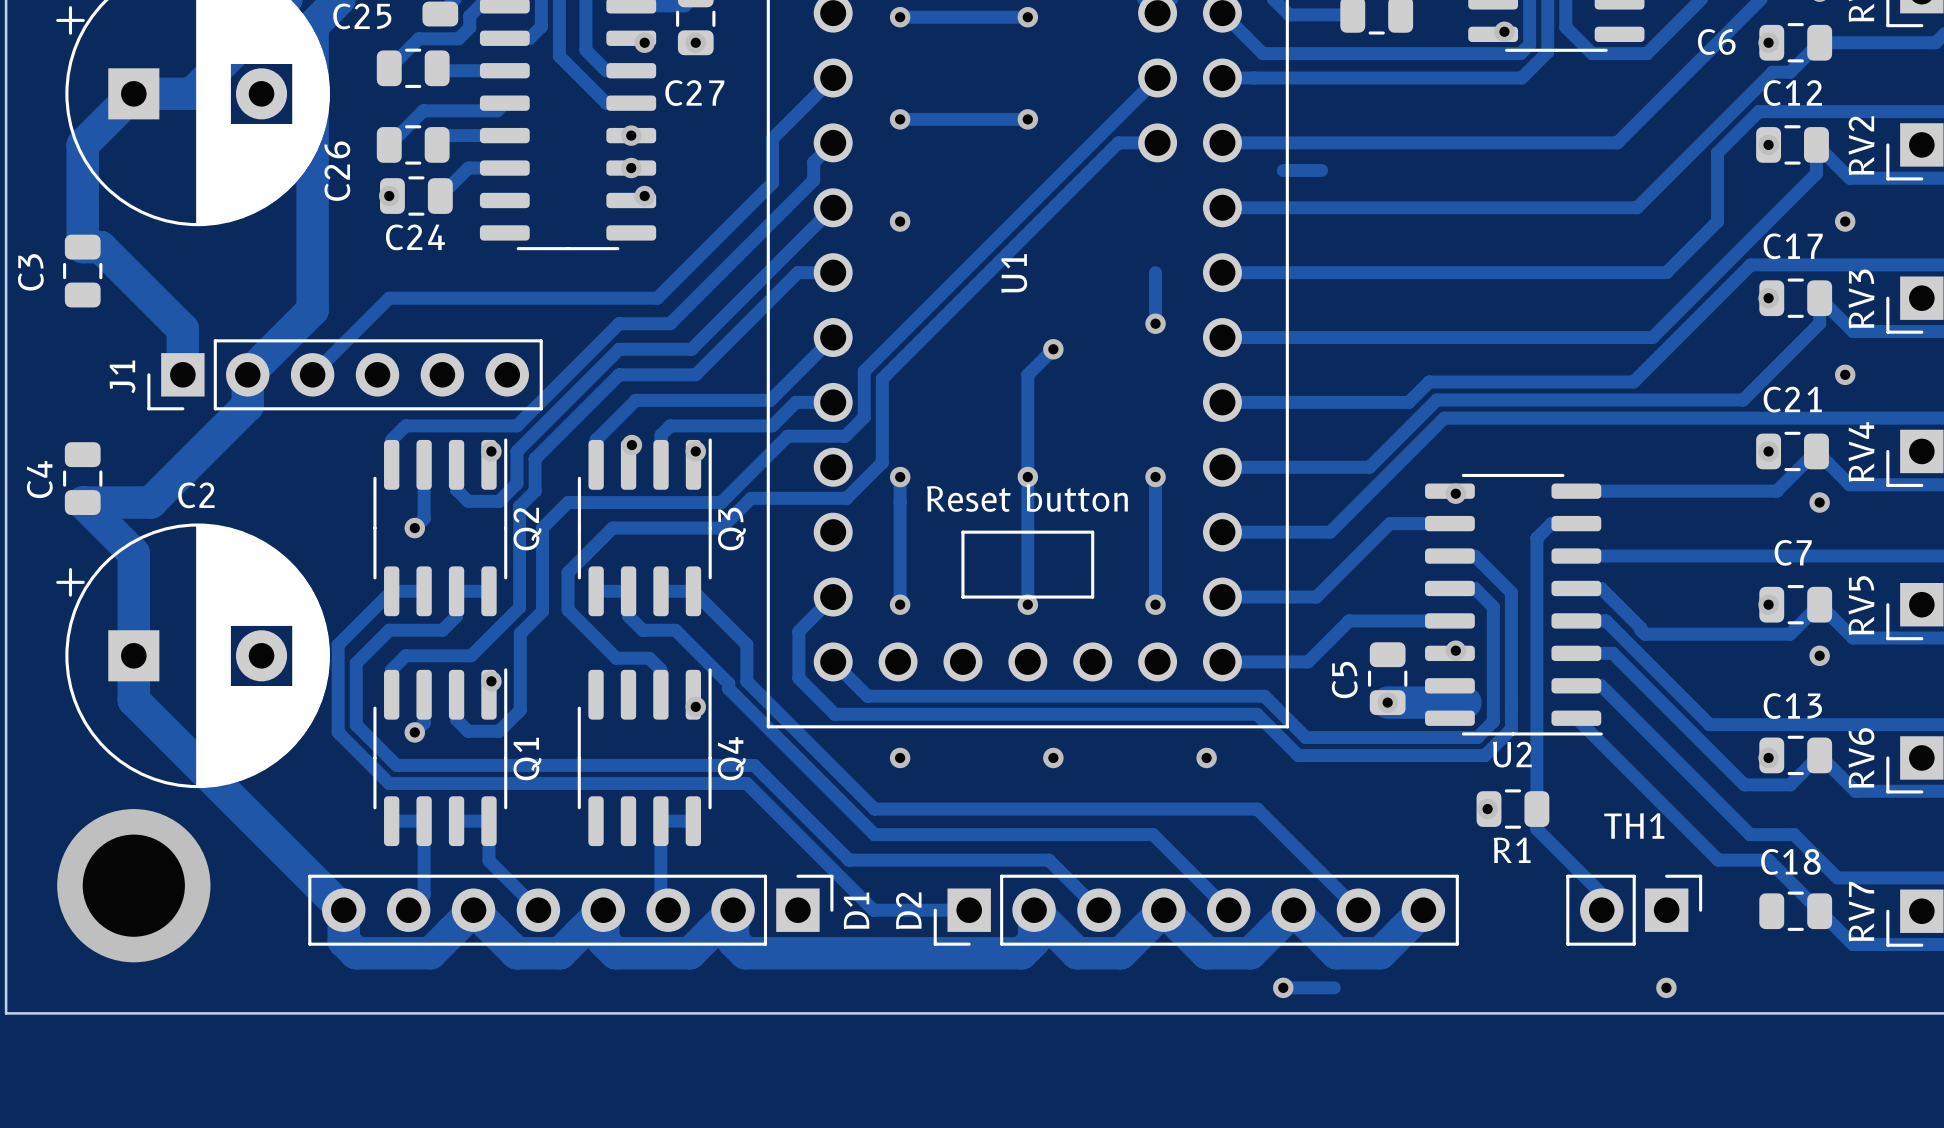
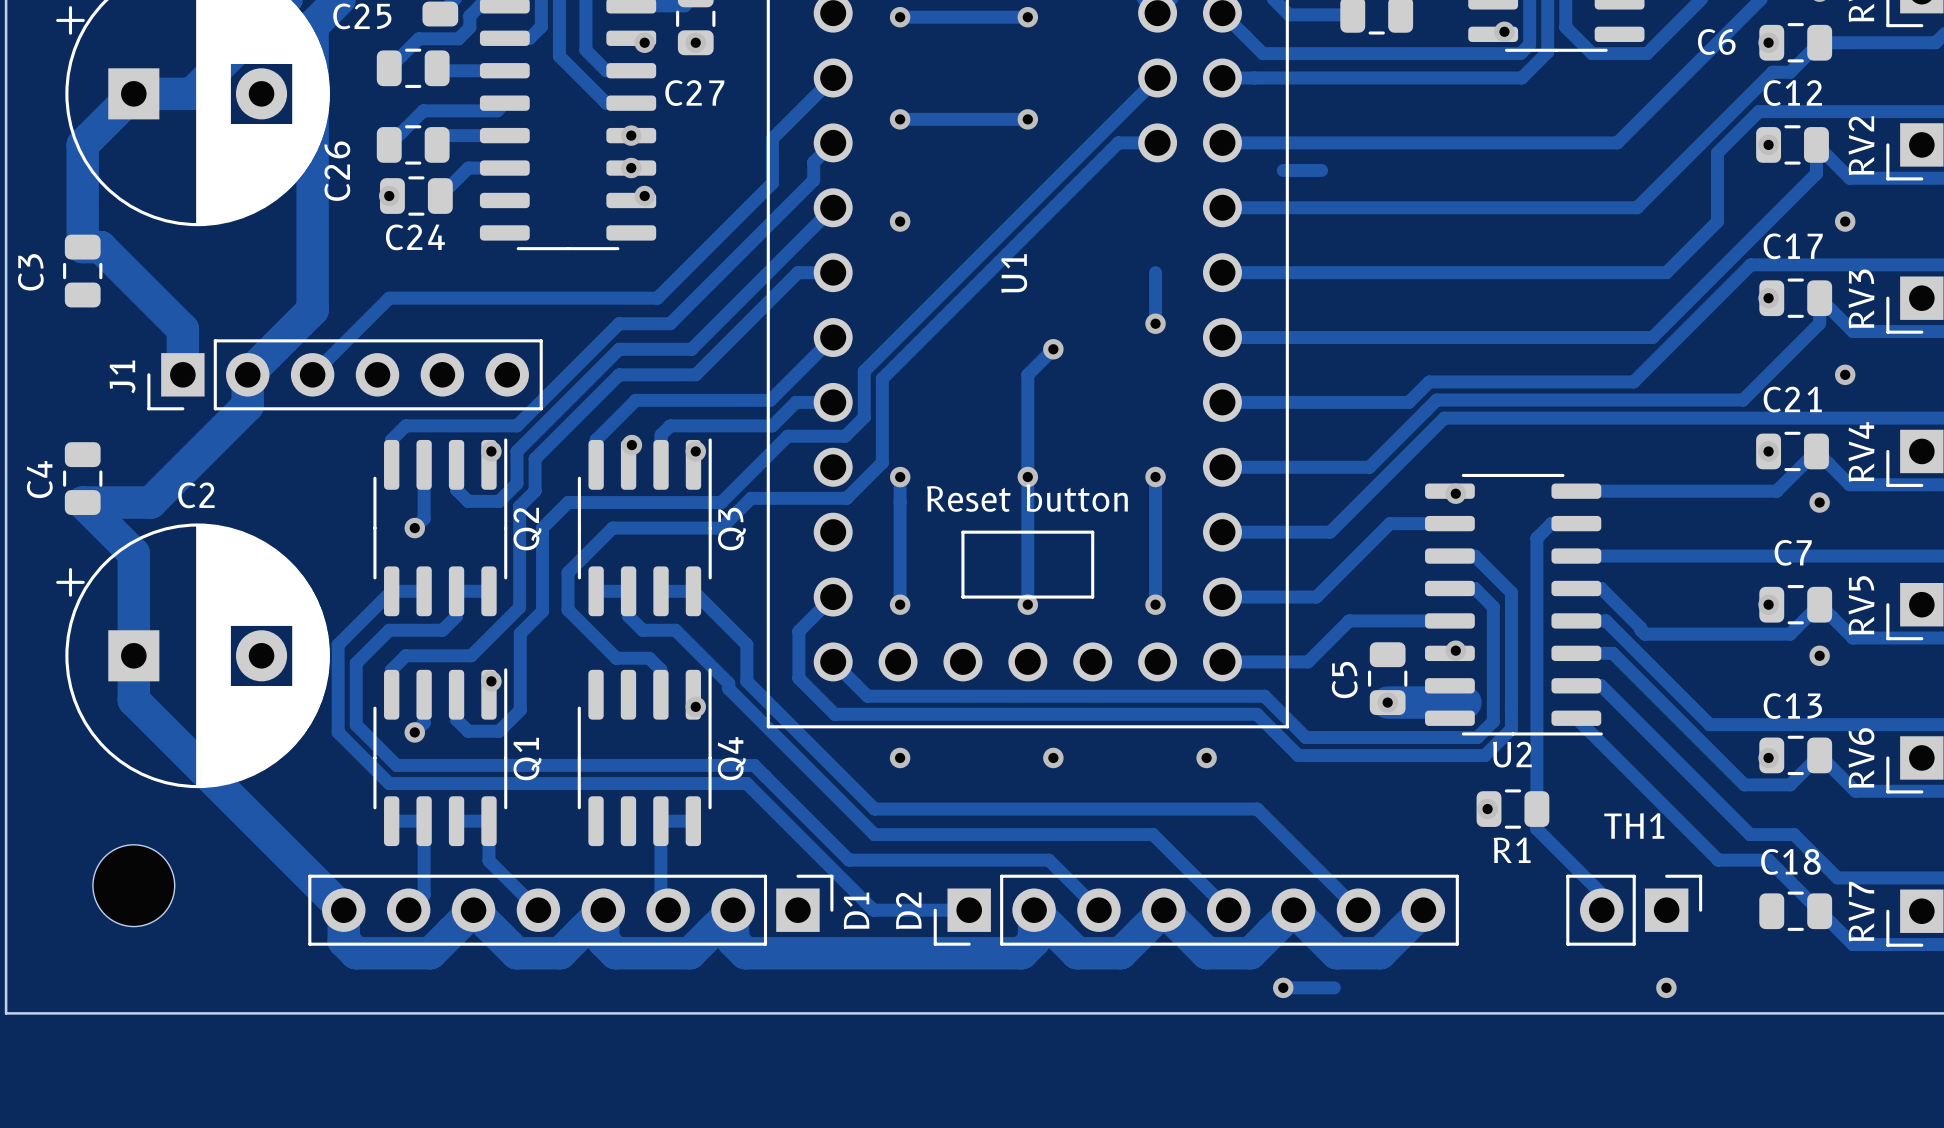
via: (133, 885) -> none
part: none -> (133, 885)

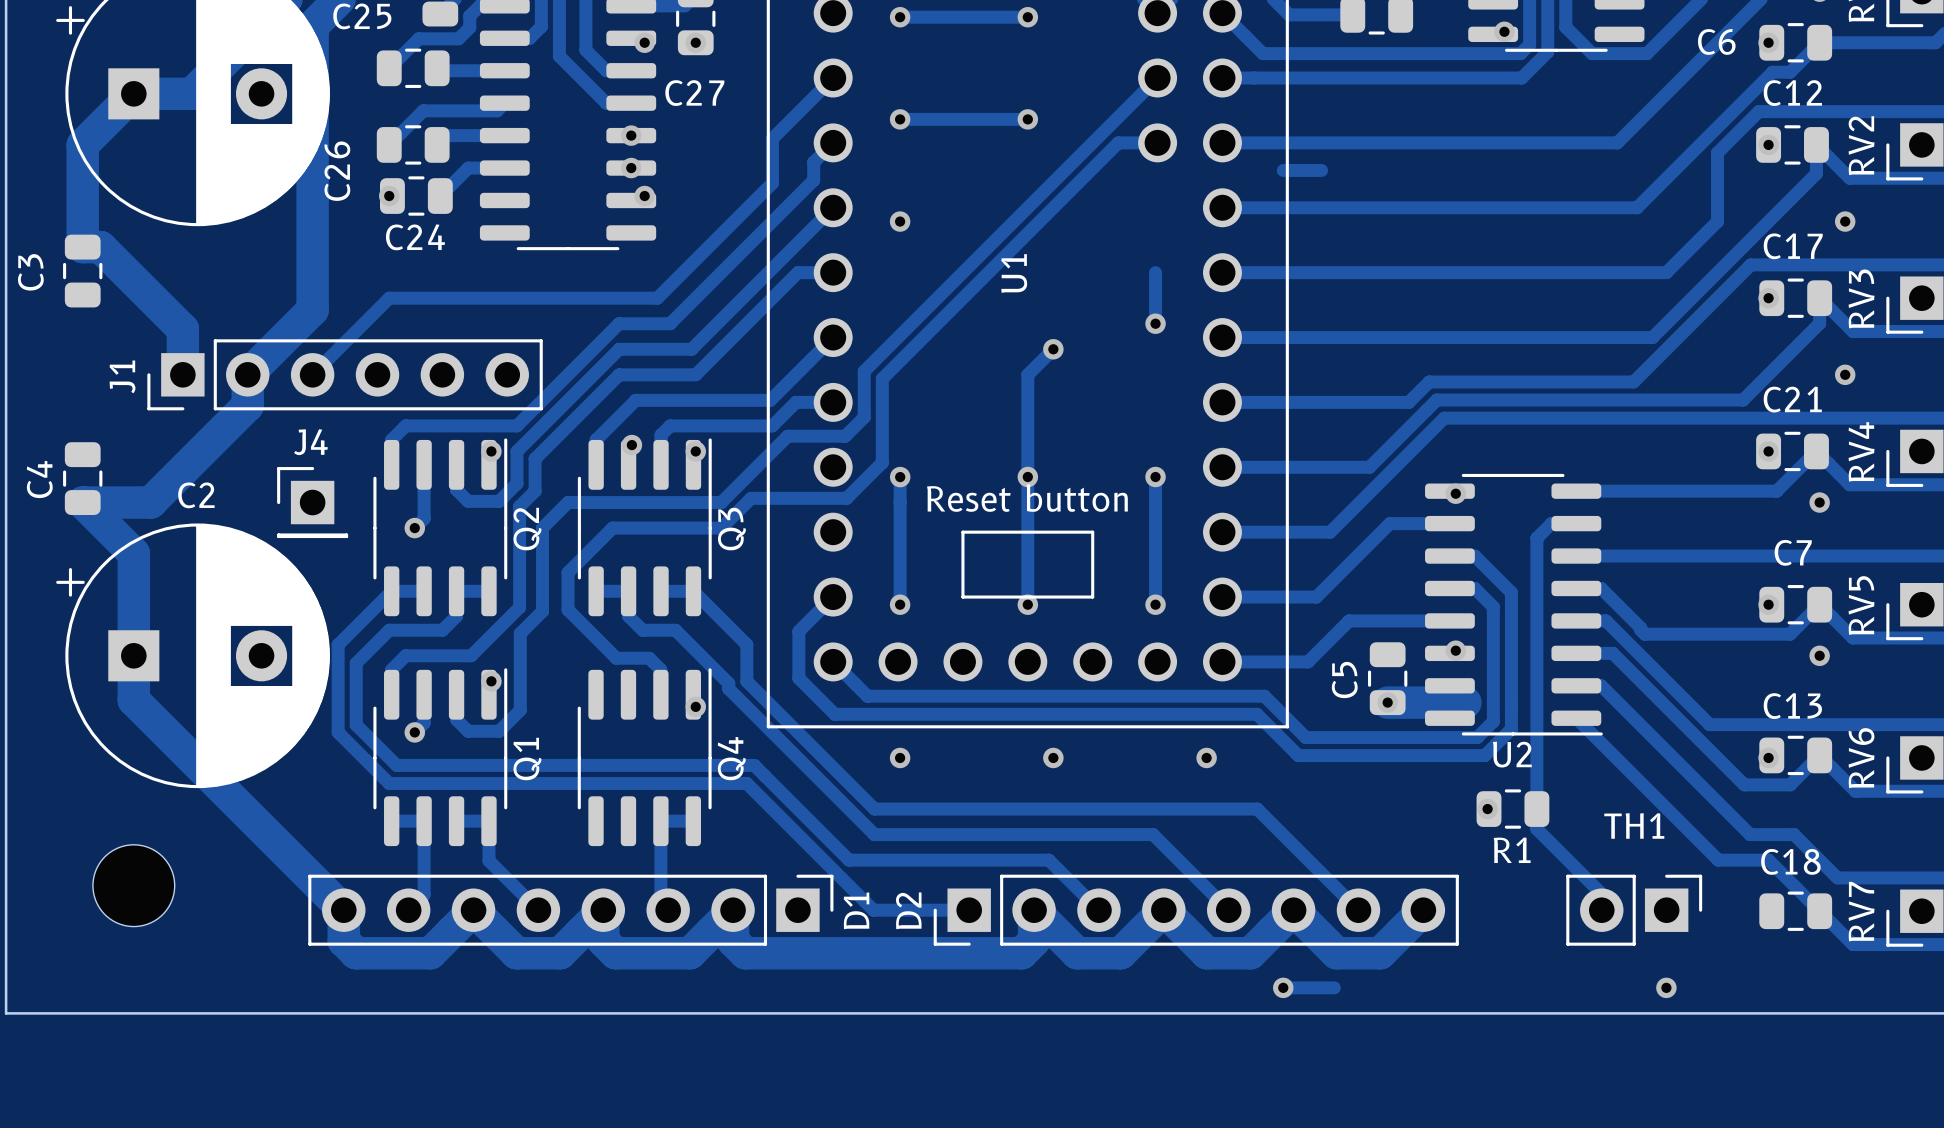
J4: none -> (312, 502)

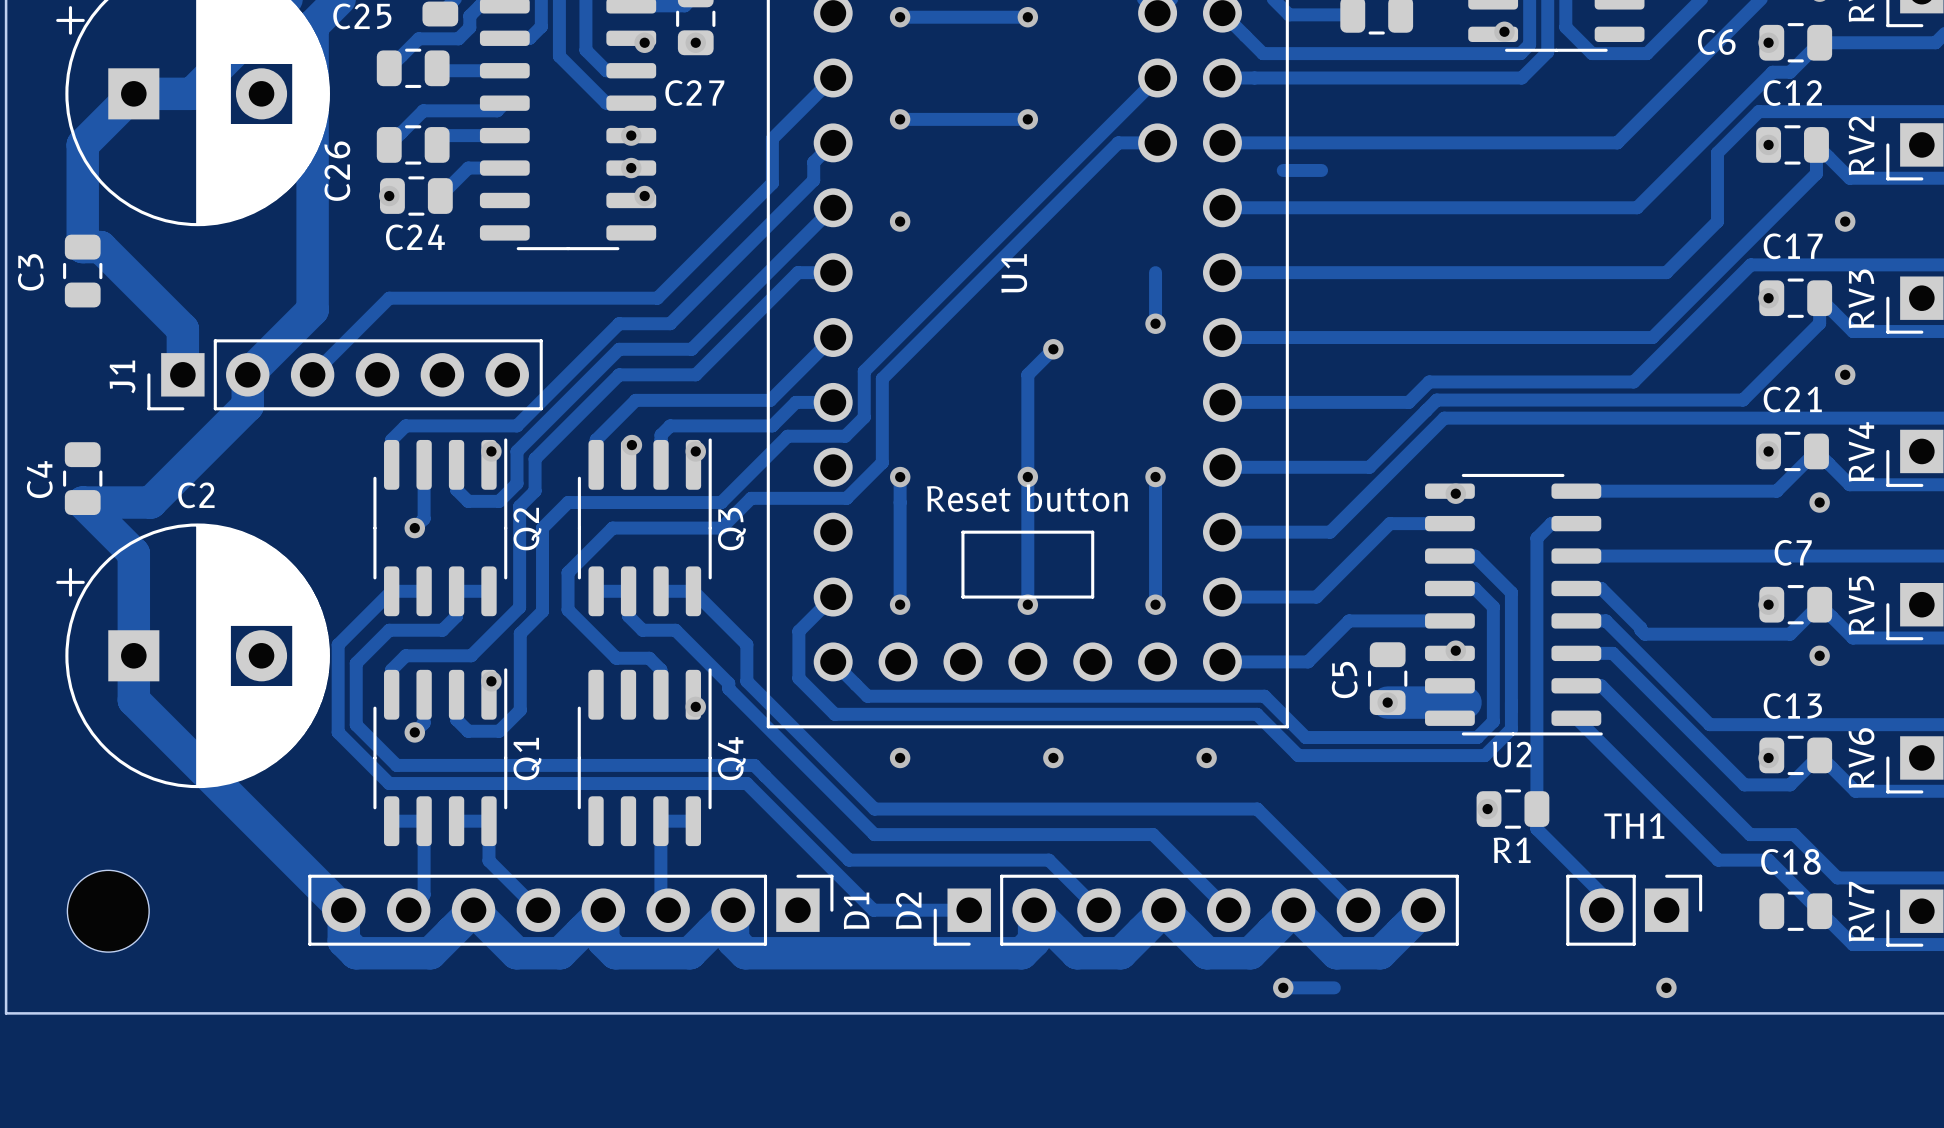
J4: (312, 502) -> none
part position: (133, 885) -> (108, 911)

